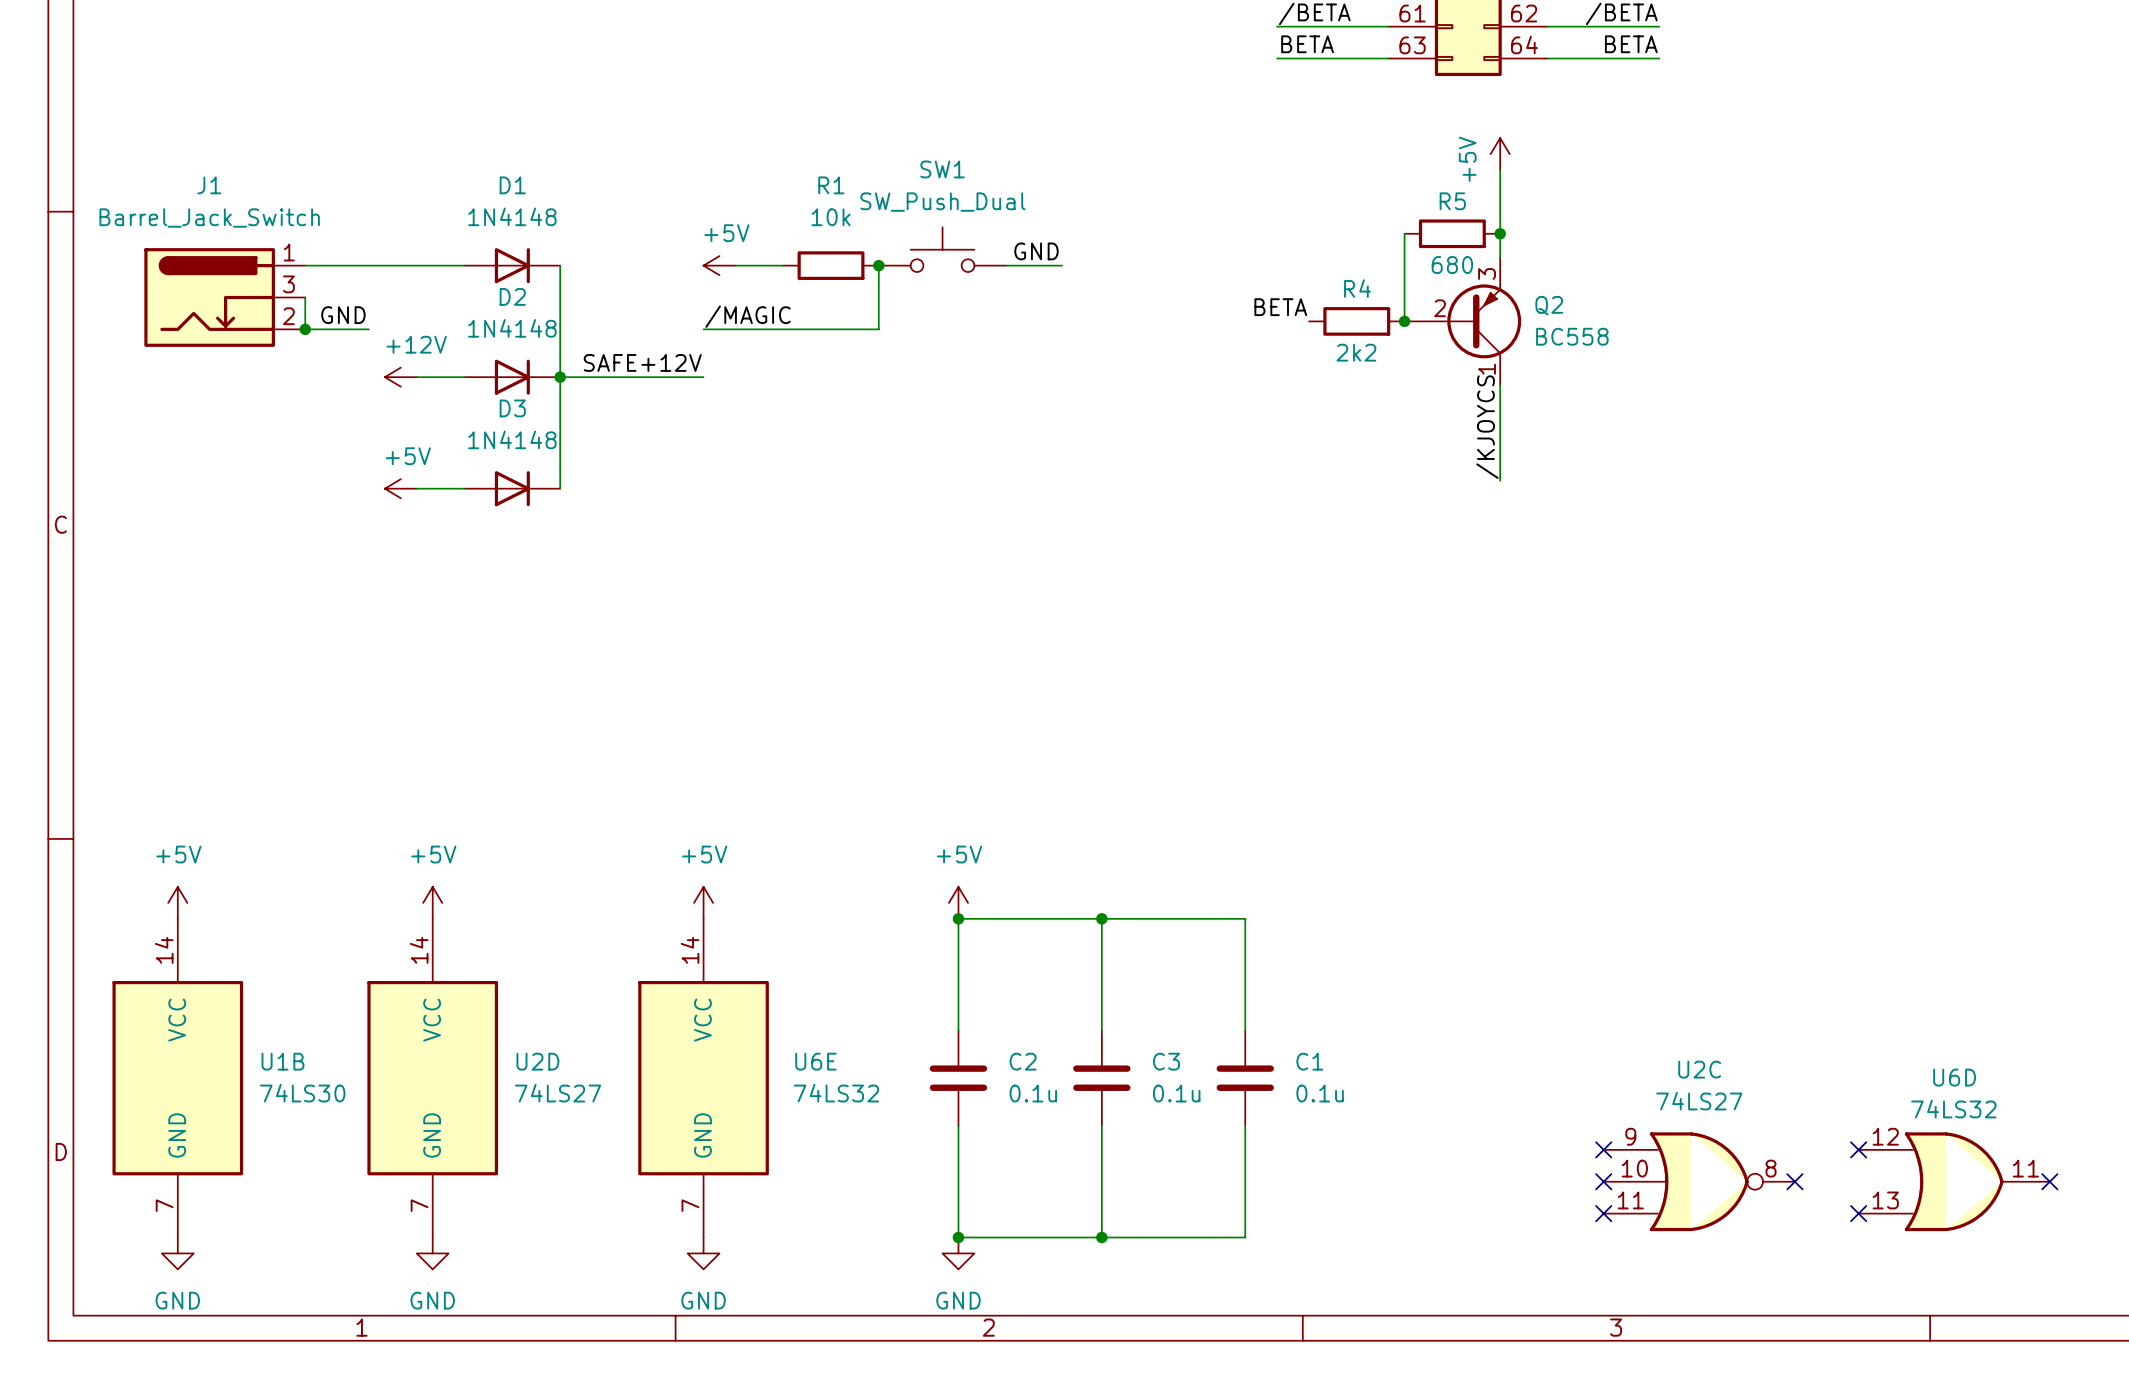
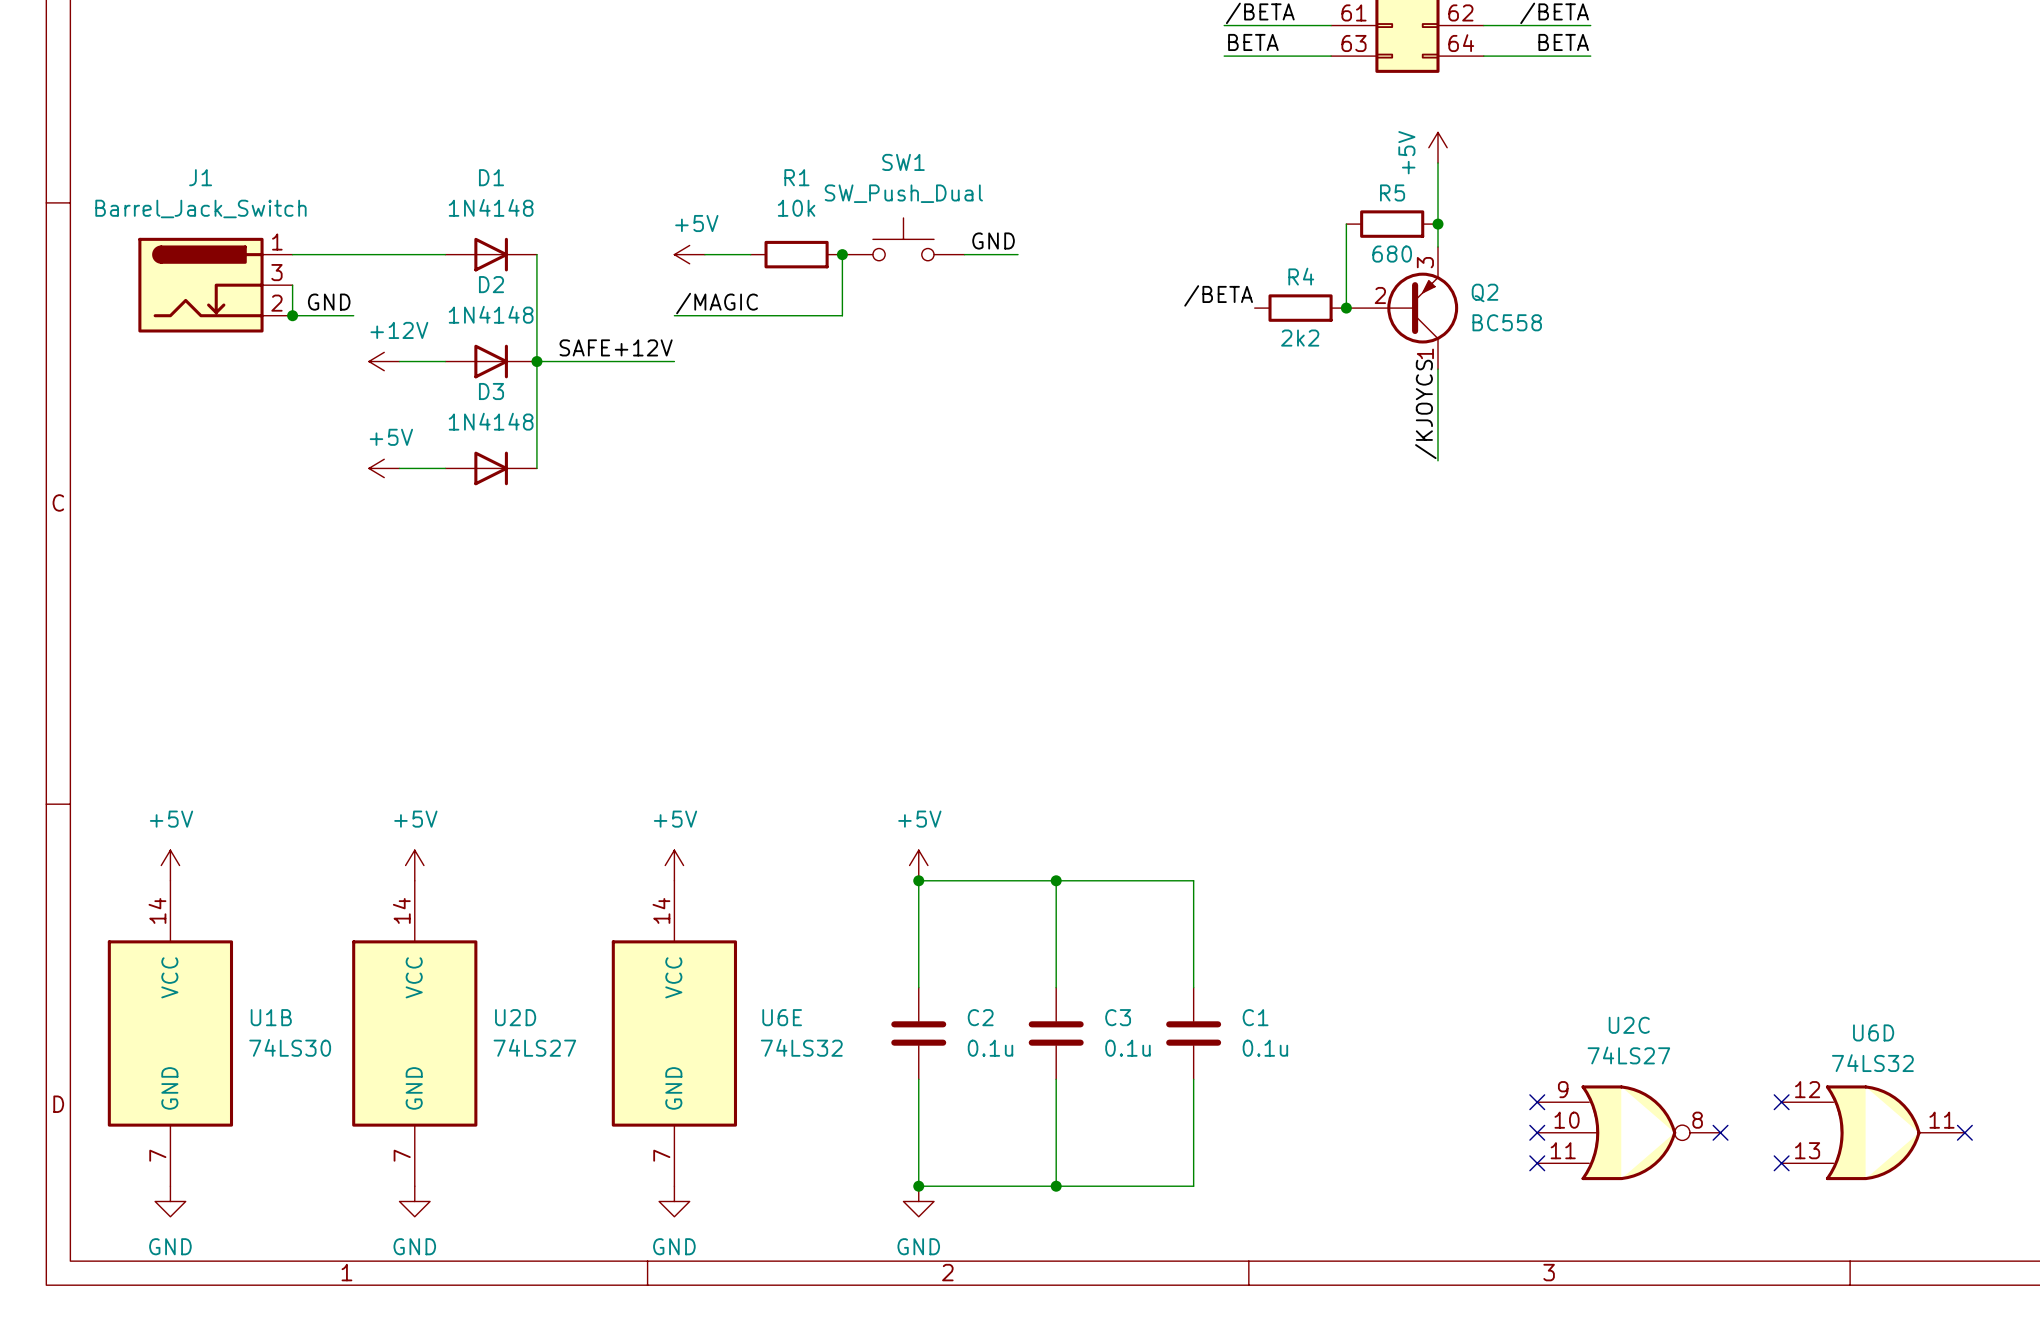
label: BETA (1280, 307) -> /BETA (1218, 295)

